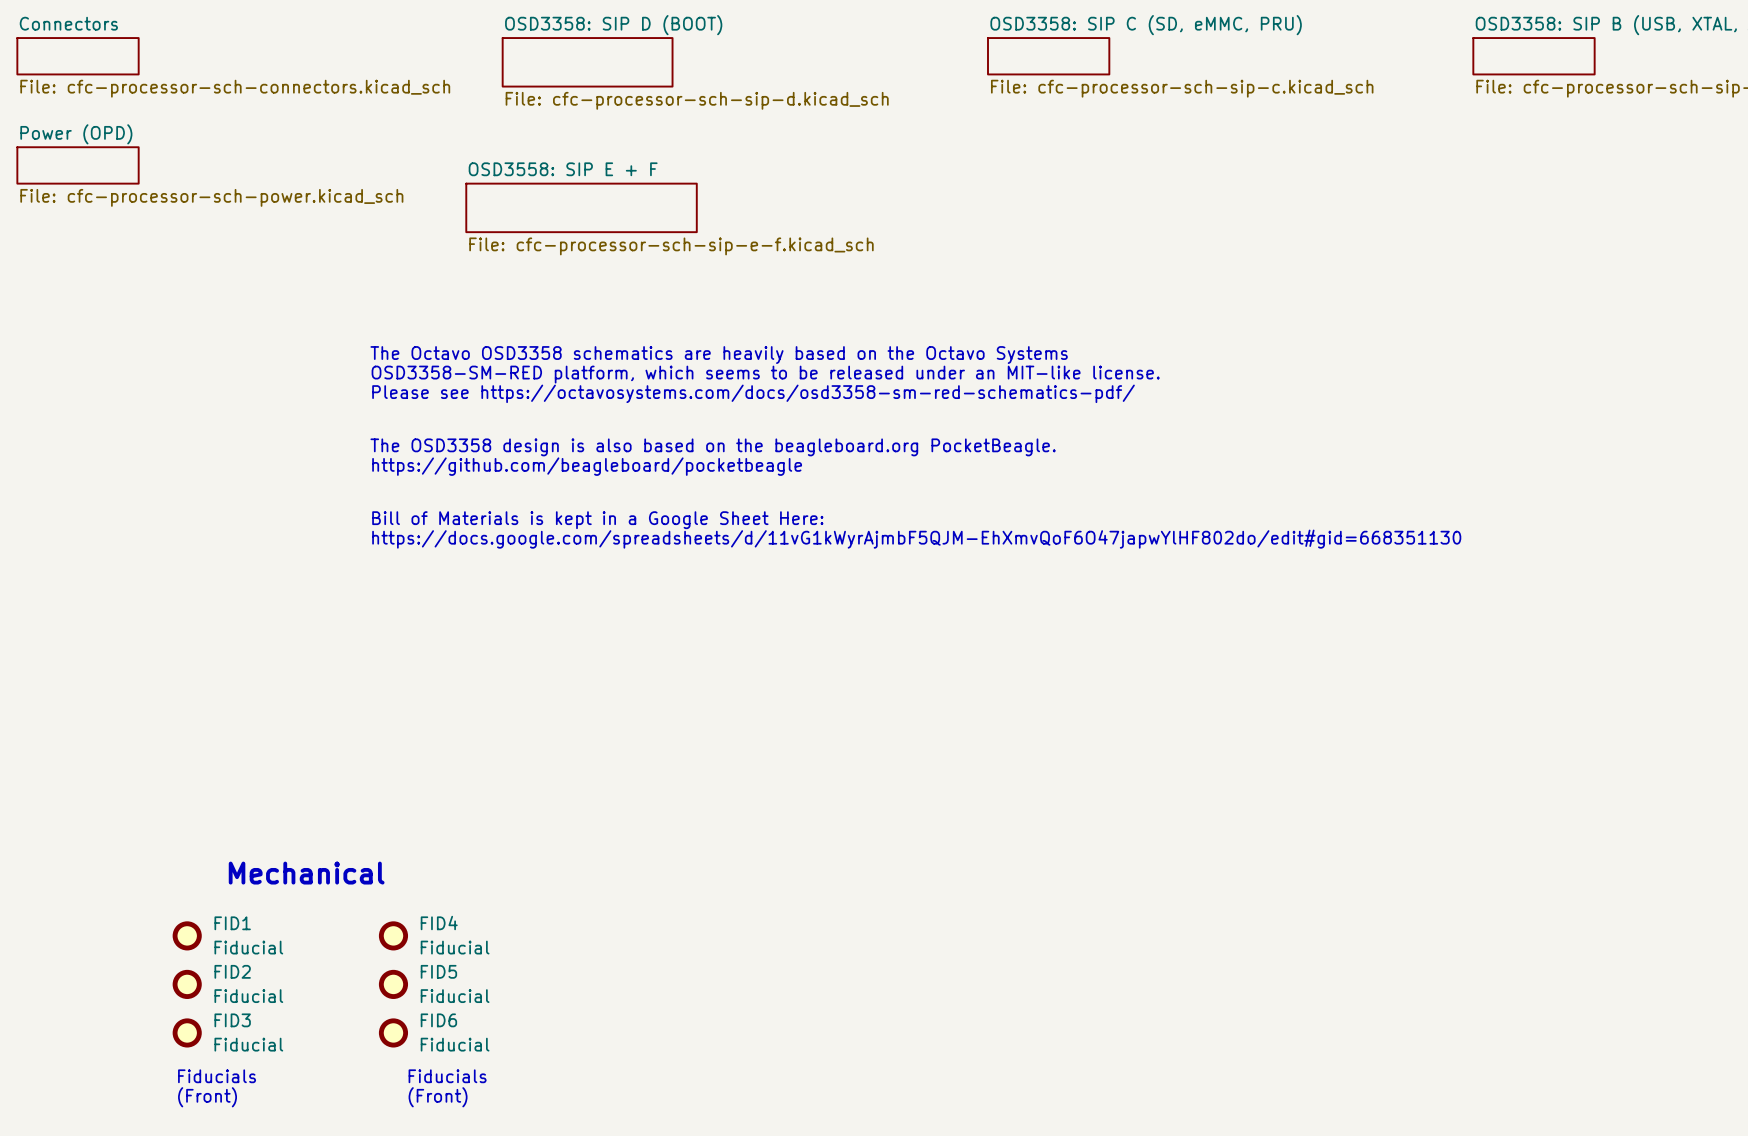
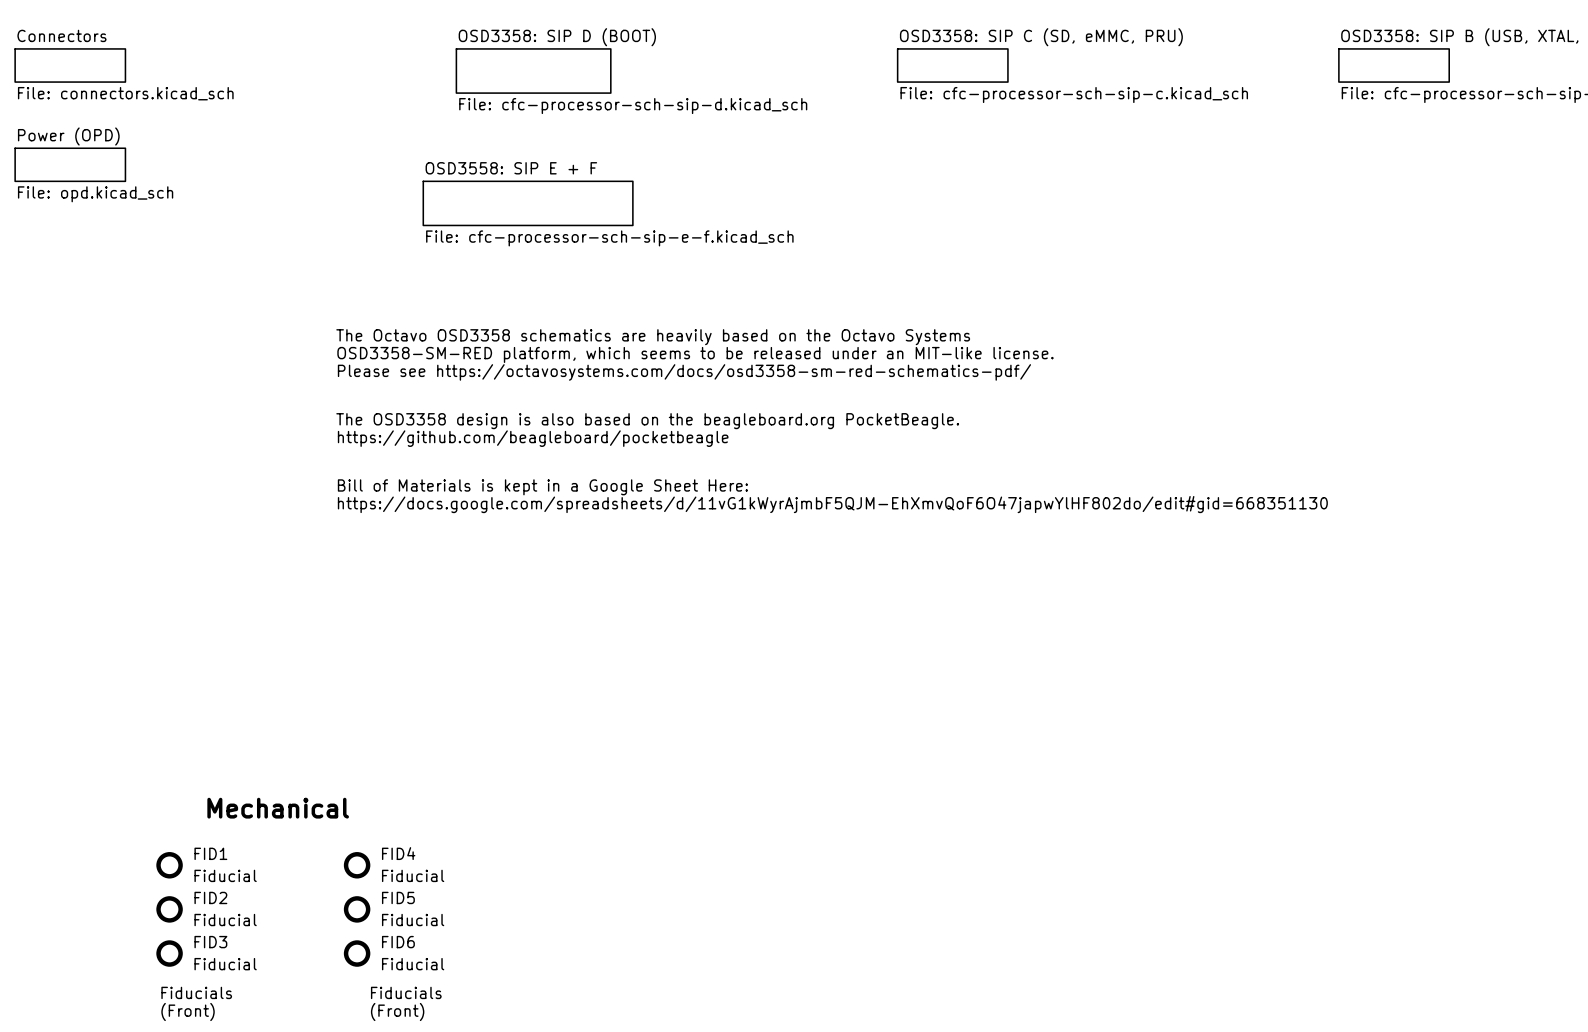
sheet Connectors value: File: cfc-processor-sch-connectors.kicad_sch (235, 88) -> File: connectors.kicad_sch (125, 93)
sheet Power (OPD) value: File: cfc-processor-sch-power.kicad_sch (211, 197) -> File: opd.kicad_sch (95, 194)

